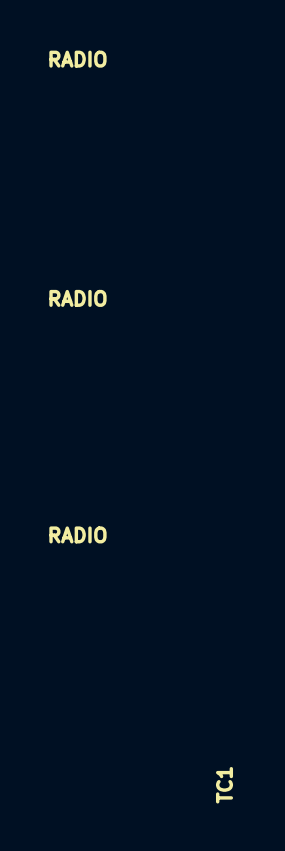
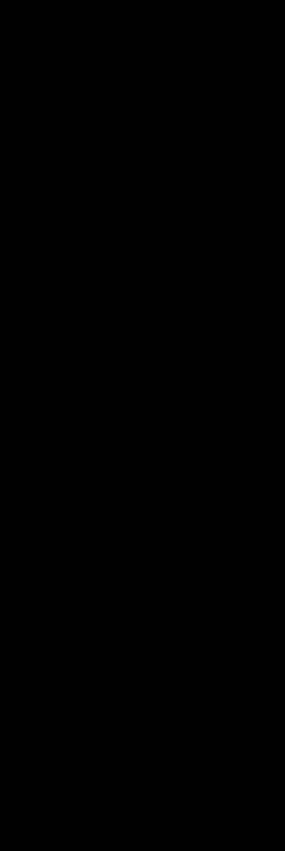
text: RADIO (77, 59) -> none
text: RADIO (77, 298) -> none
text: RADIO (77, 534) -> none
text: TC1 (224, 785) -> none

